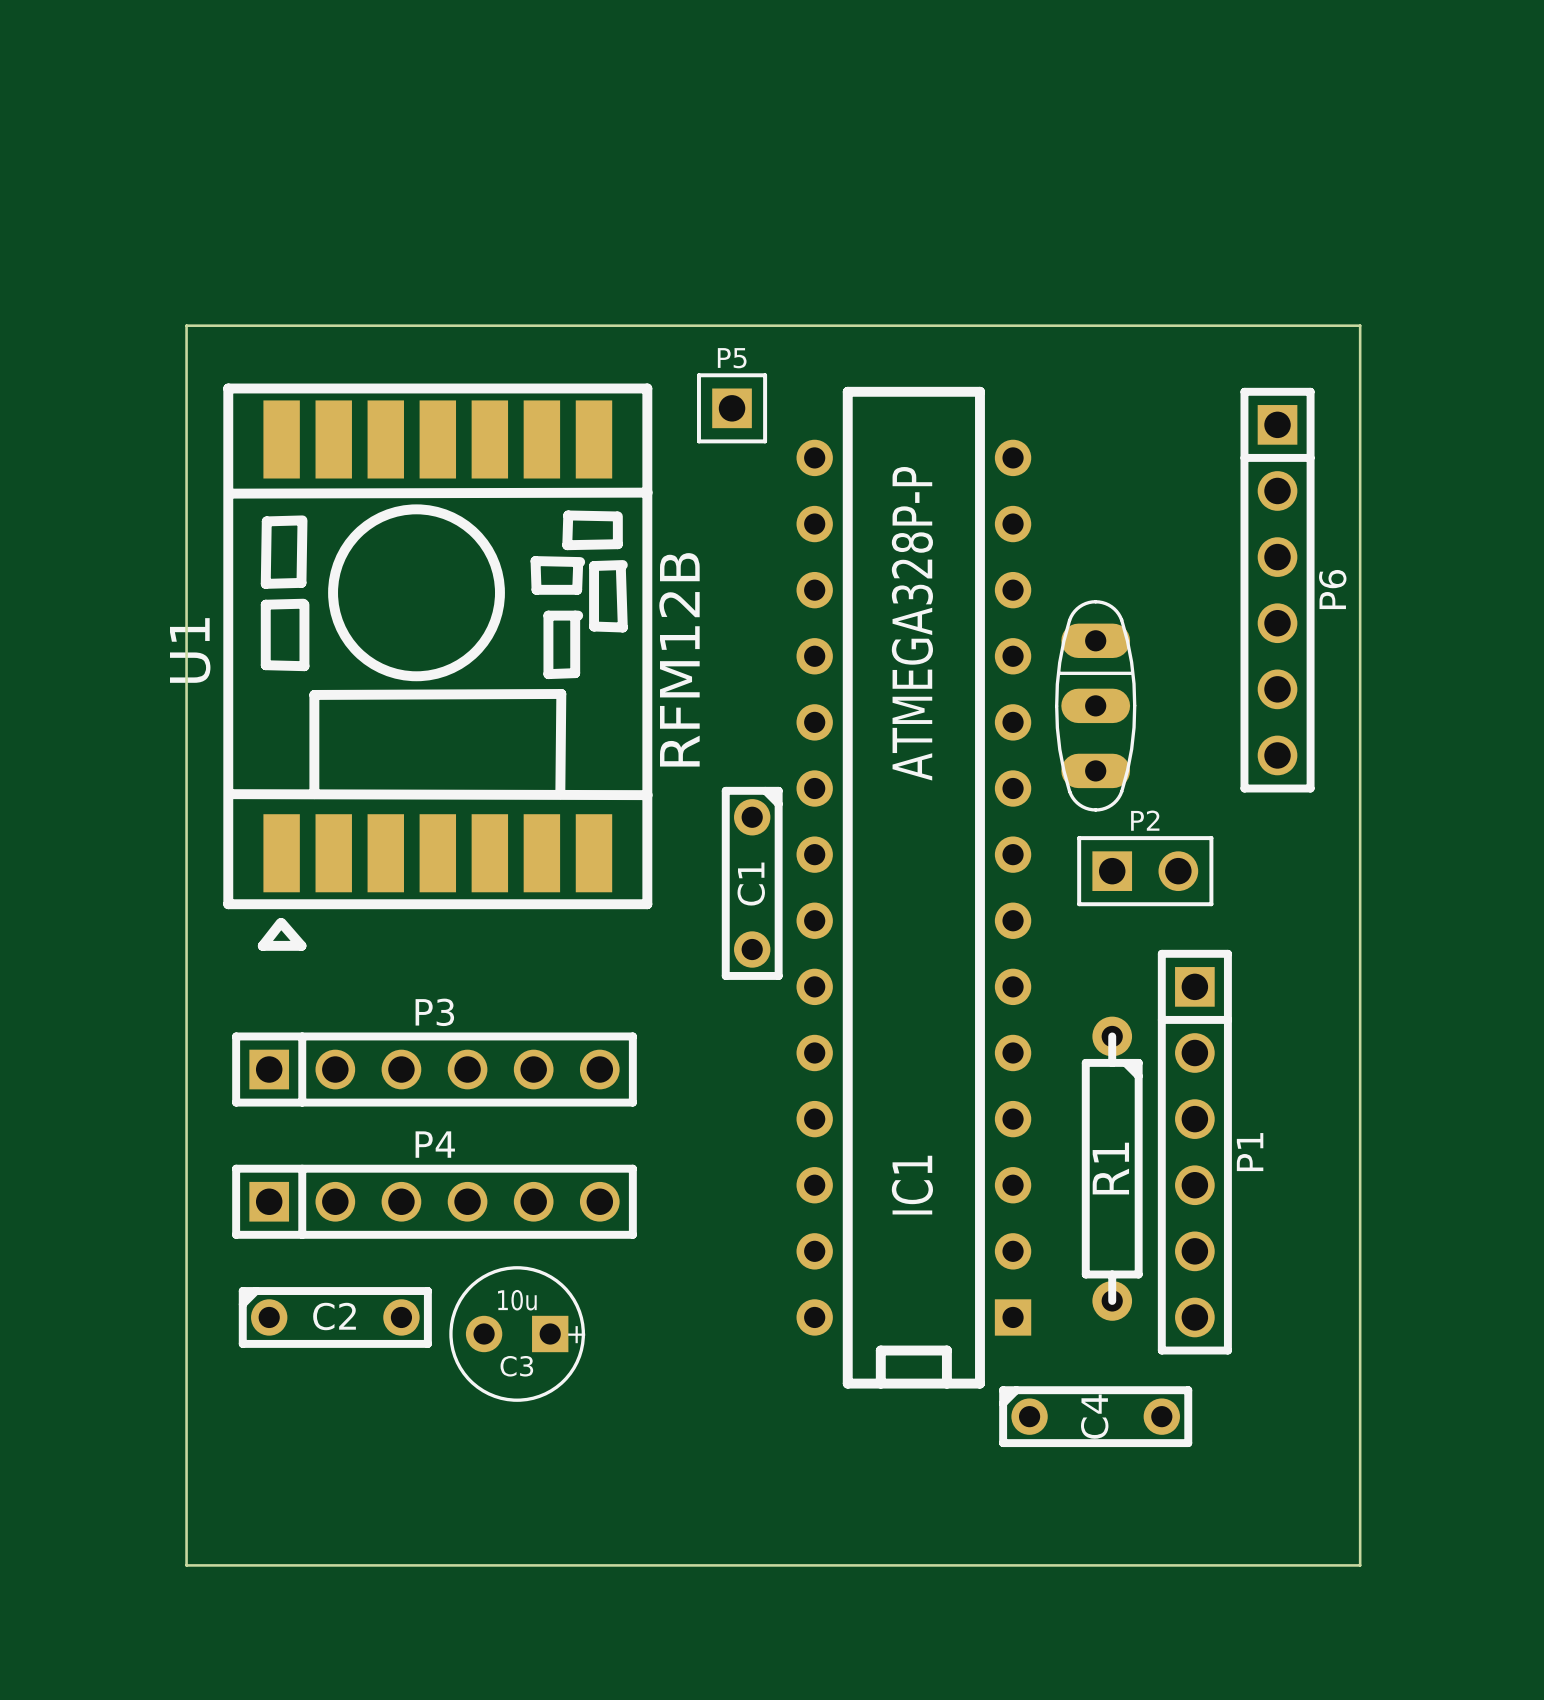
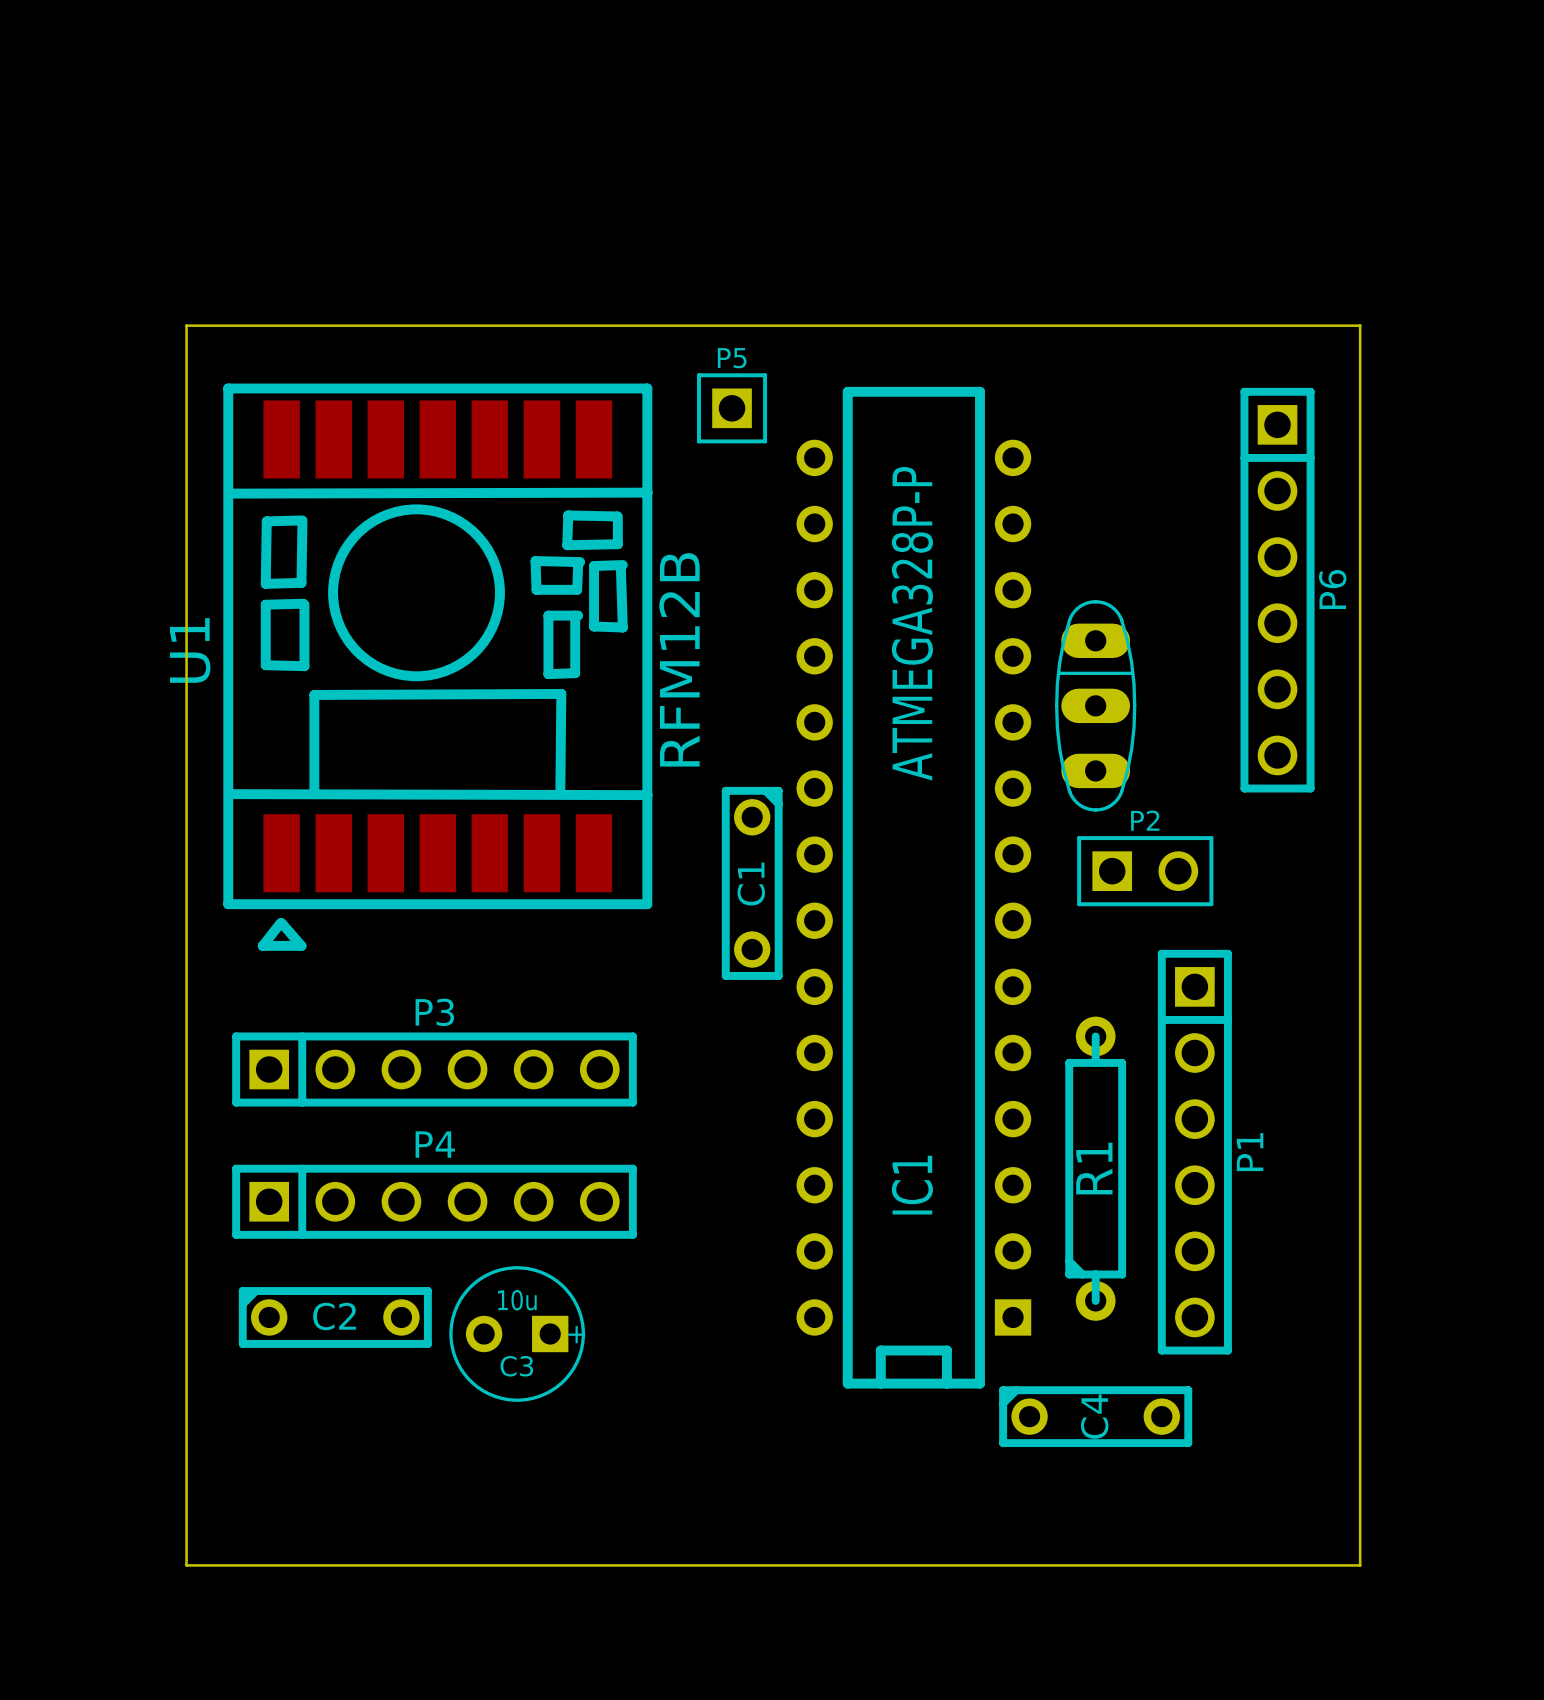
R1 rotation: 0° (1112, 1168) -> 180° (1095, 1168)

